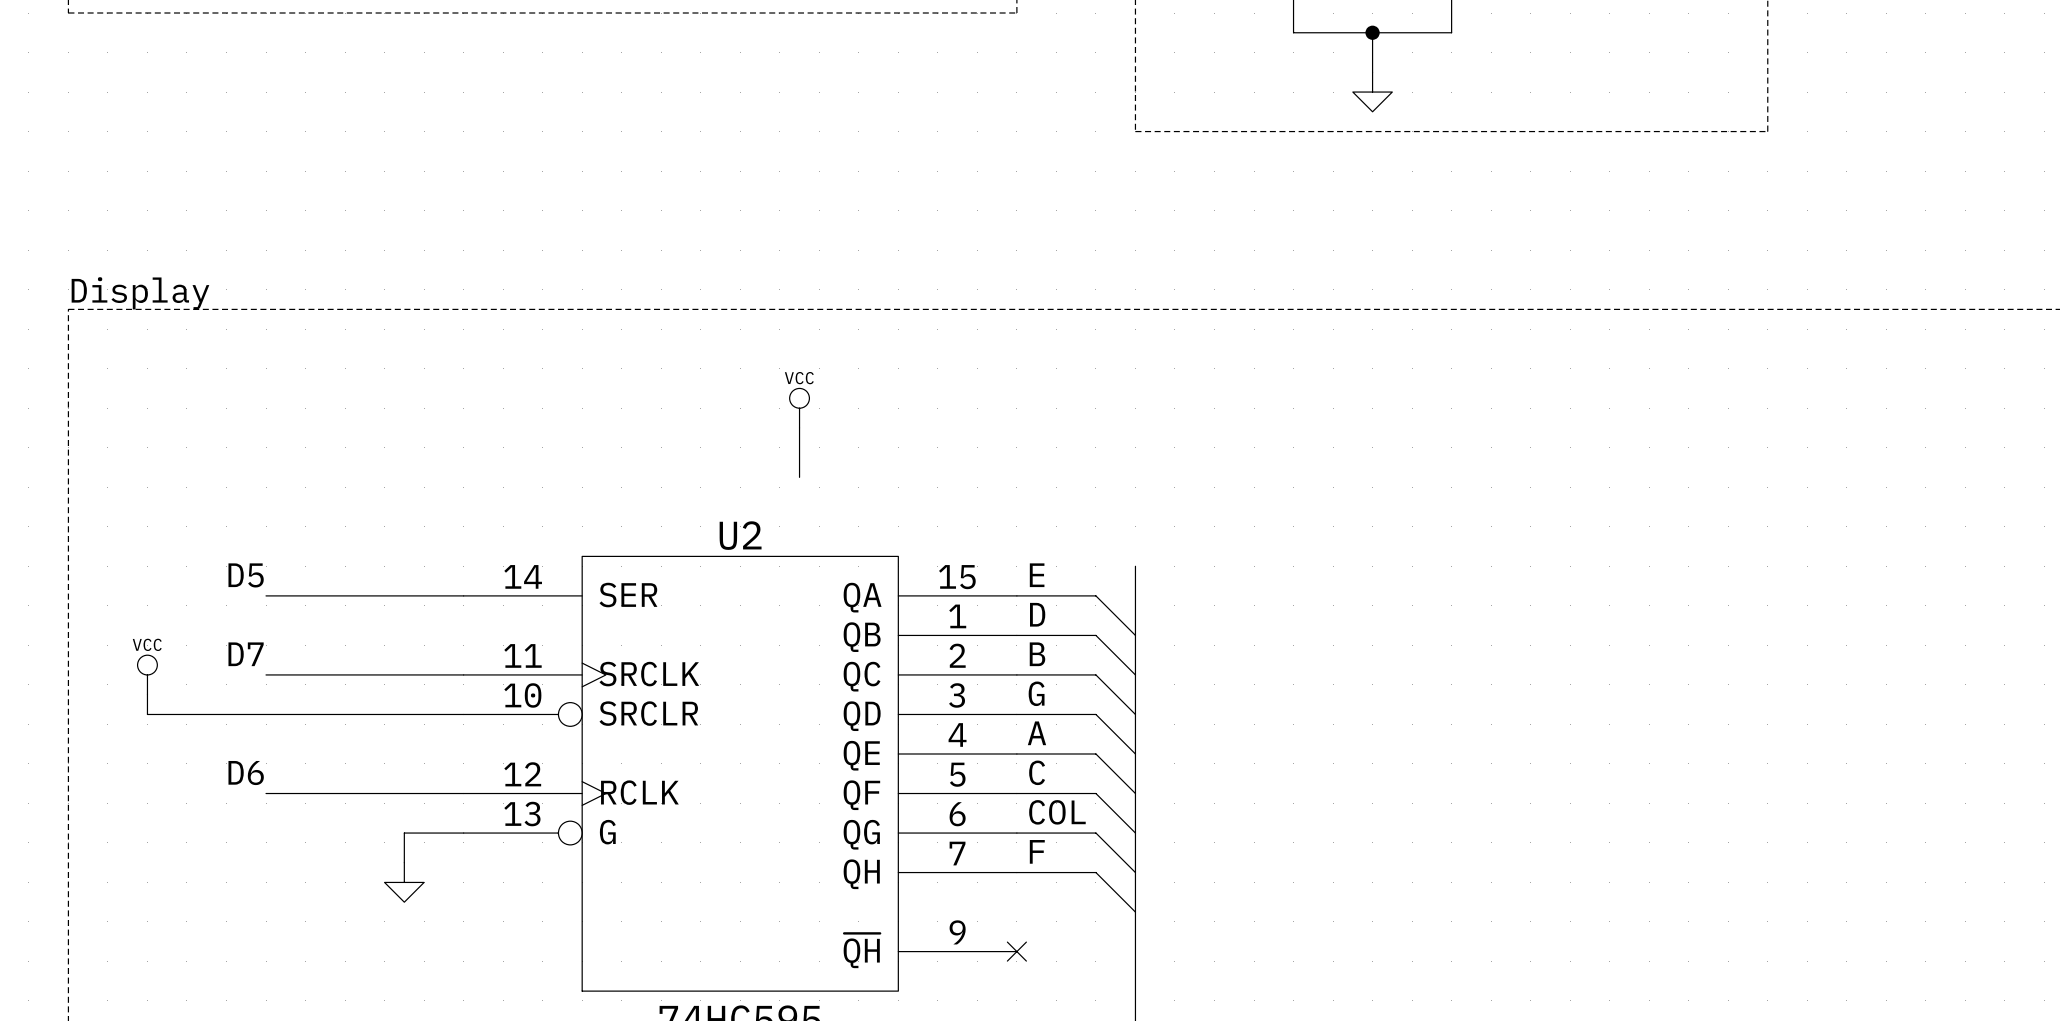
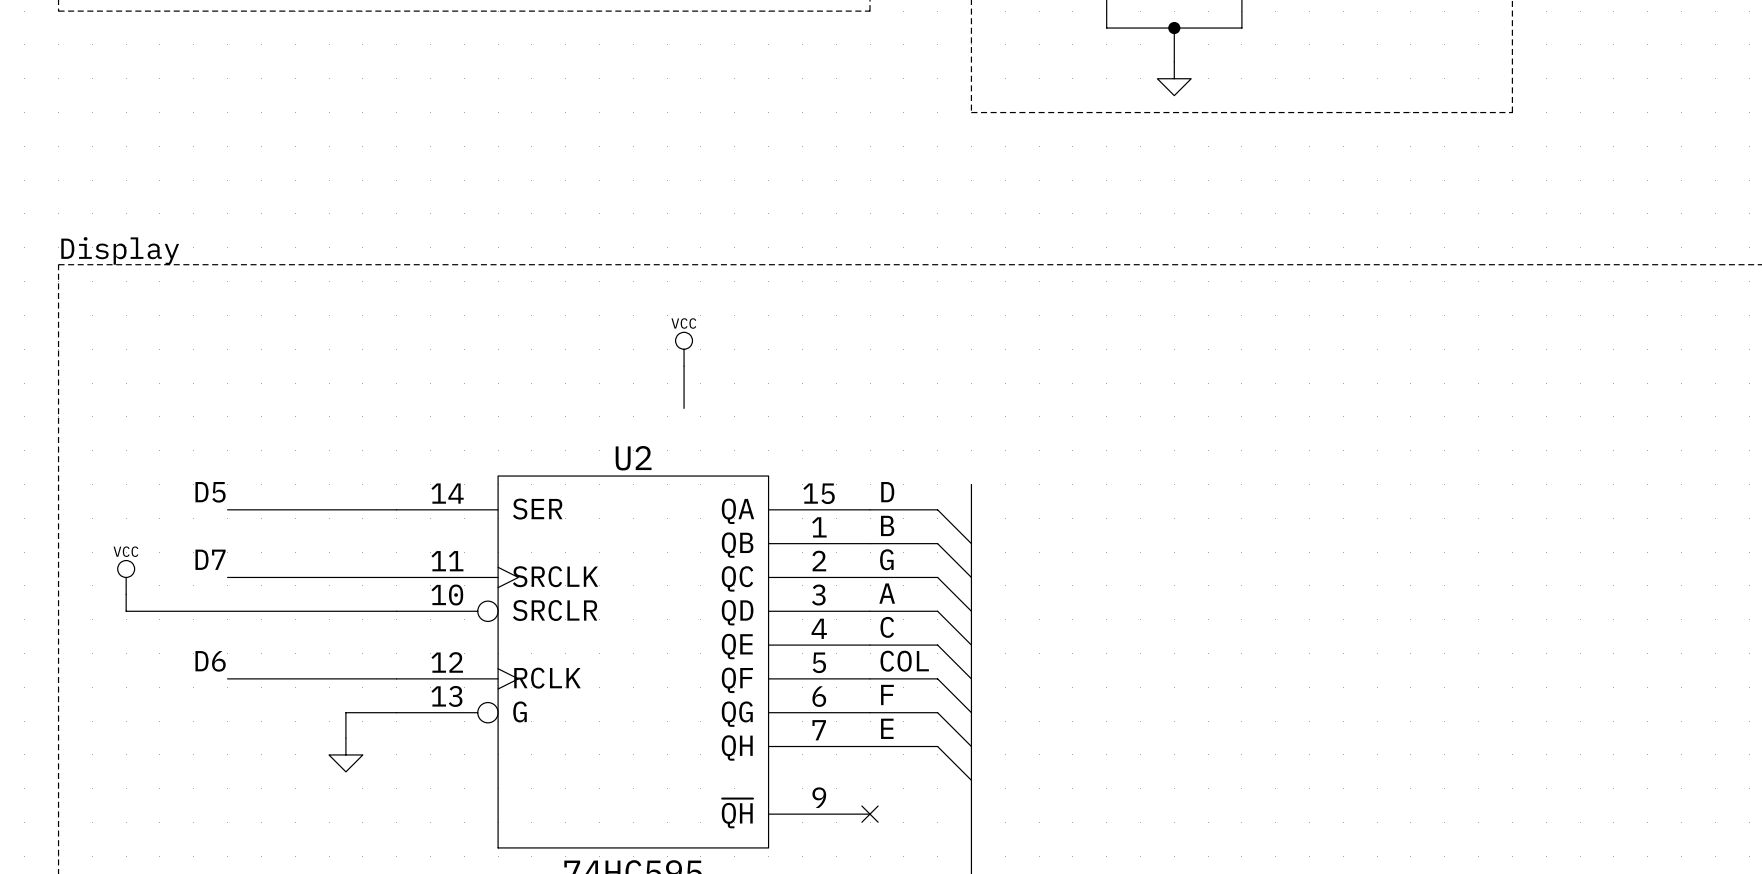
label: E (1037, 575) -> D (887, 492)
label: D (1037, 614) -> B (887, 525)
label: B (1037, 654) -> G (886, 559)
label: G (1036, 693) -> A (887, 593)
label: A (1036, 733) -> C (887, 627)
label: C (1037, 772) -> COL (904, 661)
label: COL (1057, 812) -> F (887, 695)
label: F (1037, 851) -> E (887, 728)

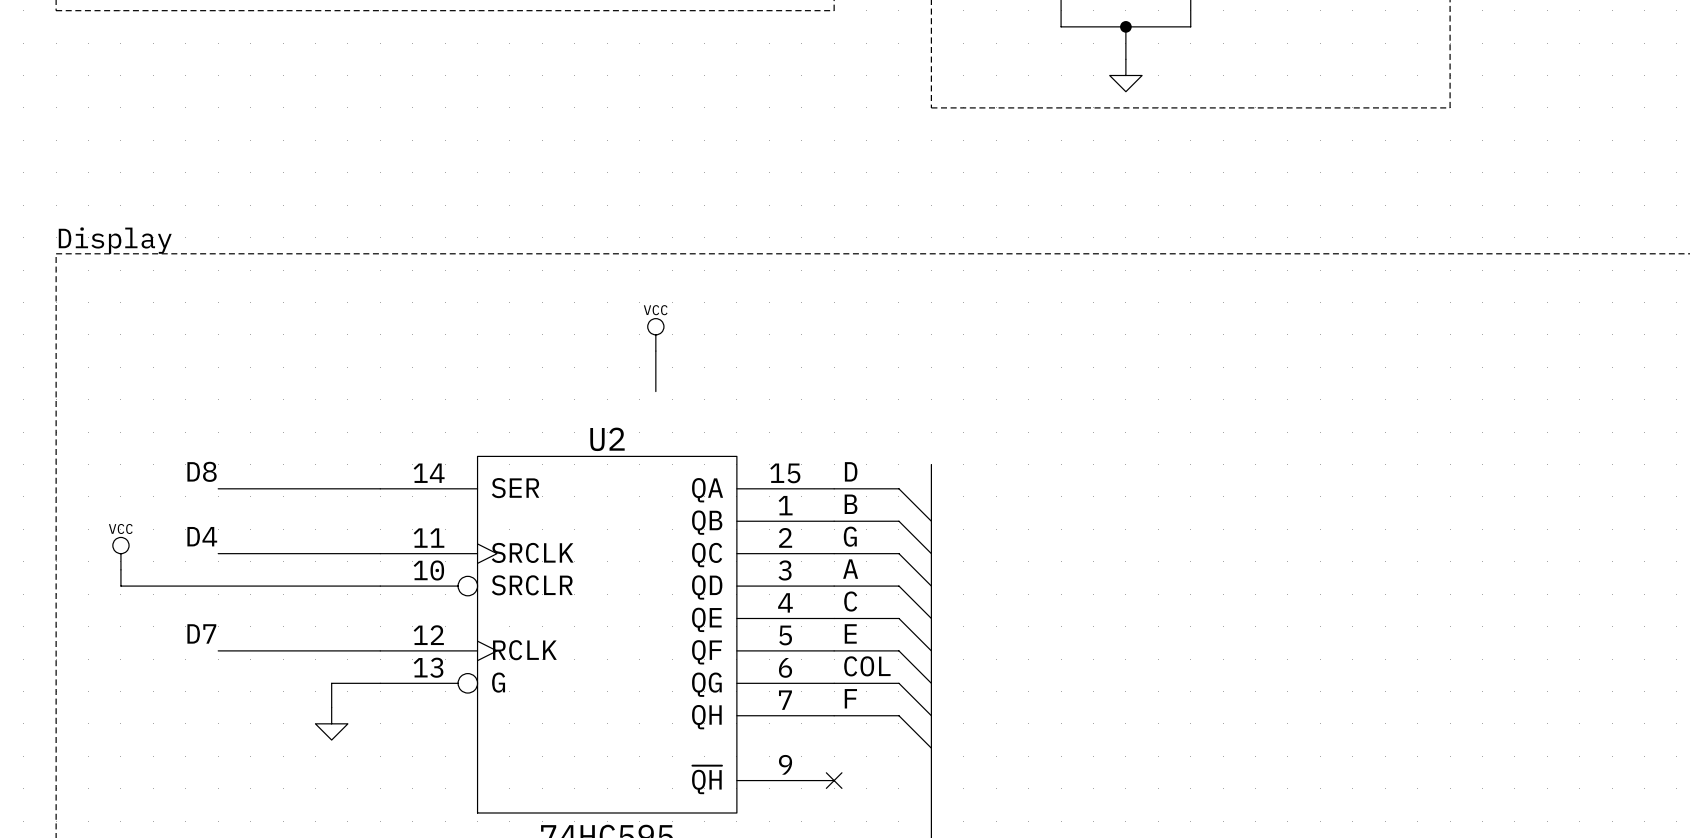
label: D5 (210, 492) -> D8 (202, 471)
label: D7 (210, 559) -> D4 (202, 536)
label: D6 (210, 661) -> D7 (201, 633)
label: COL (904, 661) -> E (850, 633)
label: F (887, 695) -> COL (867, 666)
label: E (887, 728) -> F (850, 698)

